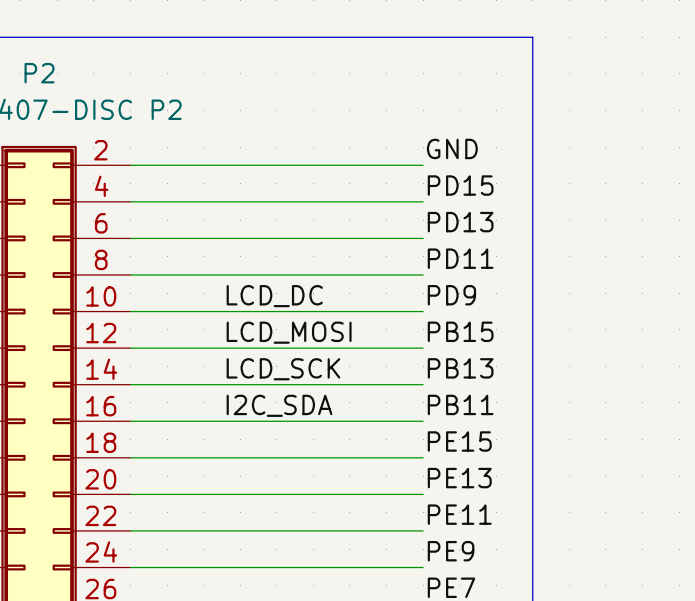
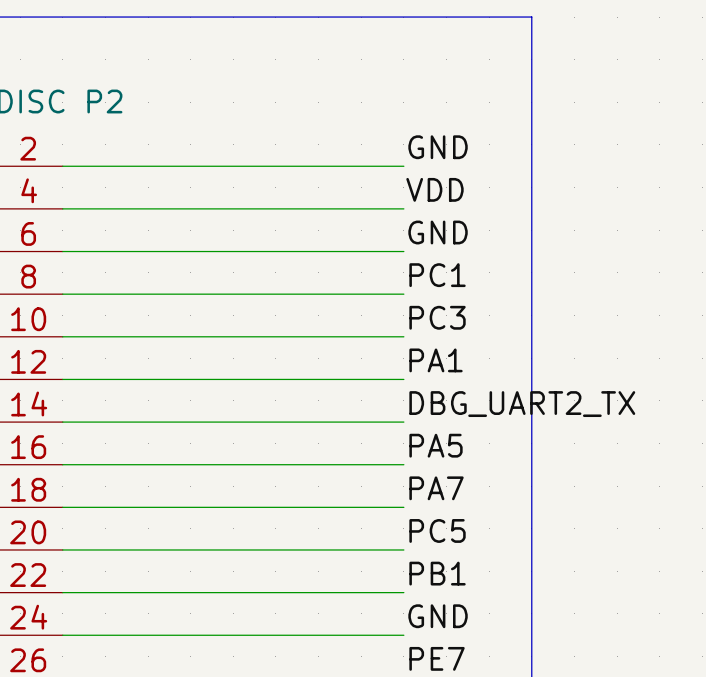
label: PD15 (460, 185) -> VDD (434, 189)
label: PD13 (460, 222) -> GND (438, 232)
label: PD11 (460, 258) -> PC1 (437, 275)
label: PD9 (451, 295) -> PC3 (437, 317)
label: LCD_DC (274, 296) -> none
label: PB15 (460, 331) -> PA1 (436, 360)
label: LCD_MOSI (289, 332) -> none
label: PB13 (460, 368) -> DBG_UART2_TX (522, 404)
label: LCD_SCK (283, 369) -> none
label: PB11 (460, 404) -> PA5 (436, 445)
label: I2C_SDA (279, 405) -> none
label: PE15 (459, 441) -> PA7 (436, 488)
label: PE13 (459, 478) -> PC5 (437, 530)
label: PE11 (459, 514) -> PB1 (437, 573)
label: PE9 (451, 551) -> GND (438, 616)

